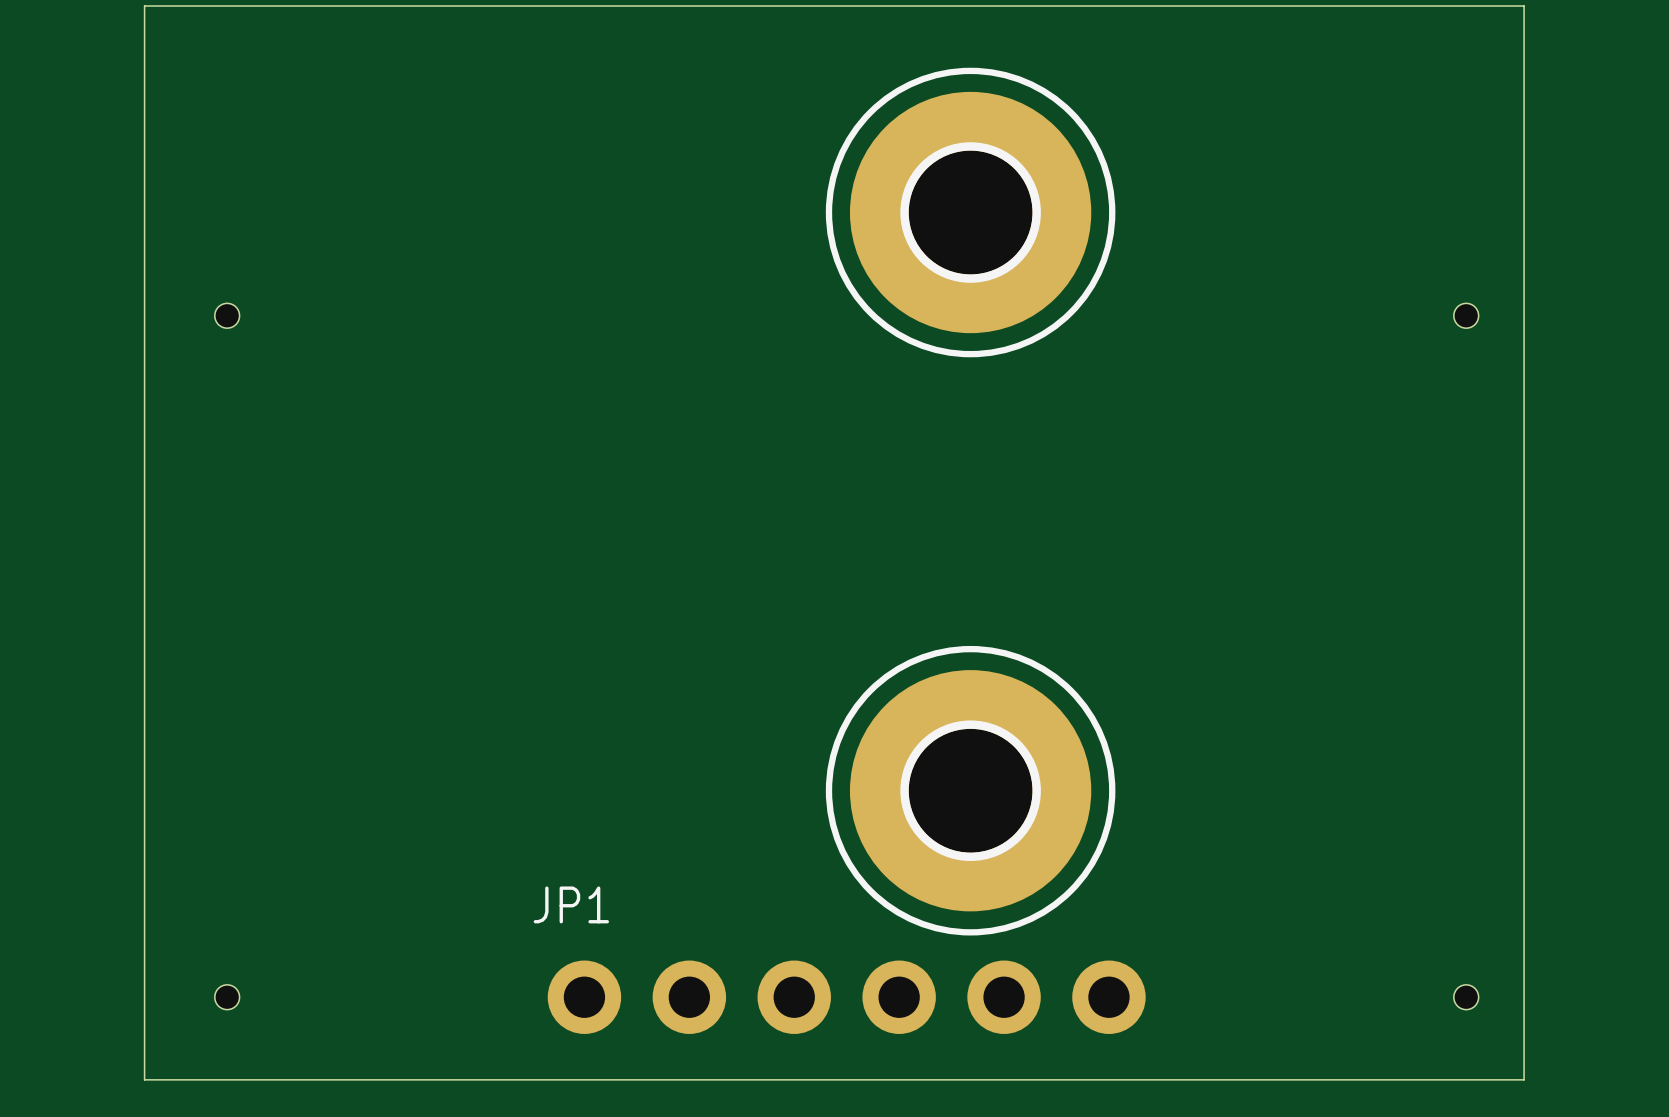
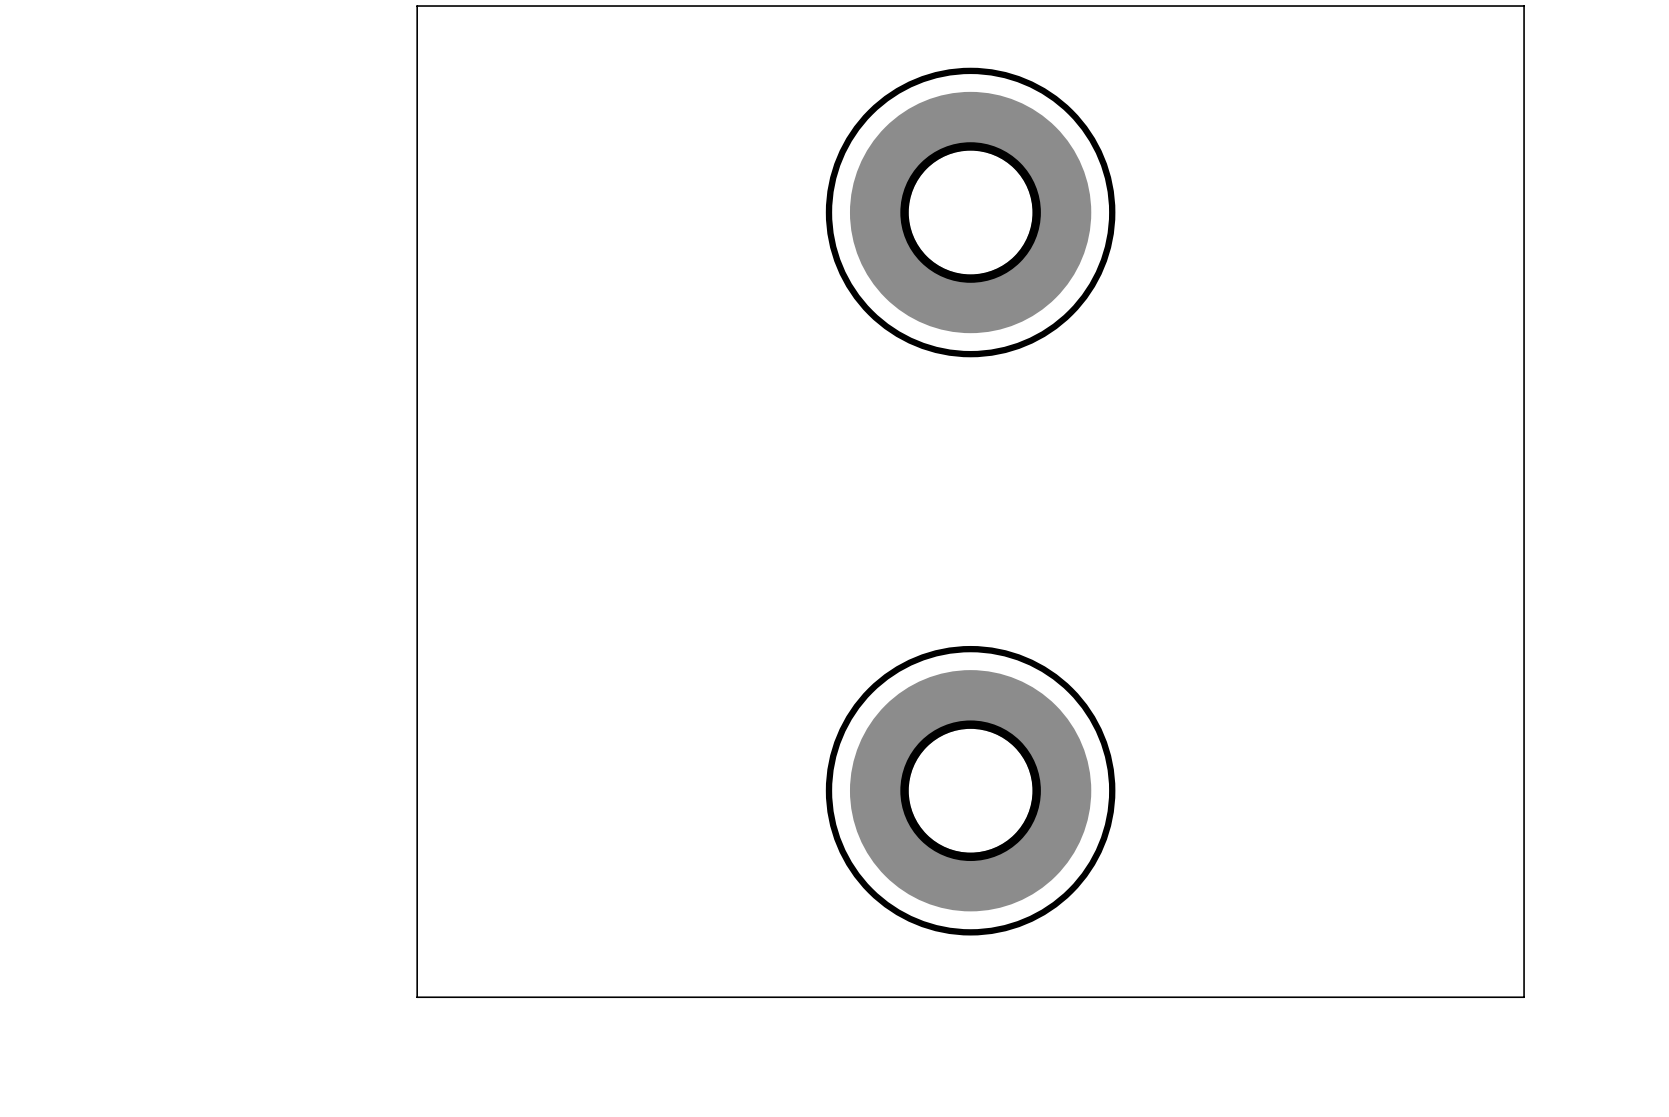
board edge: (417, 6) (144, 6) (144, 1079) (1524, 1079) (1524, 997) -> (417, 6) (417, 997) (1524, 997)
hole: (227, 315) -> none
hole: (1466, 315) -> none
hole: (227, 997) -> none
JP1: (846, 997) -> none
hole: (1466, 997) -> none

